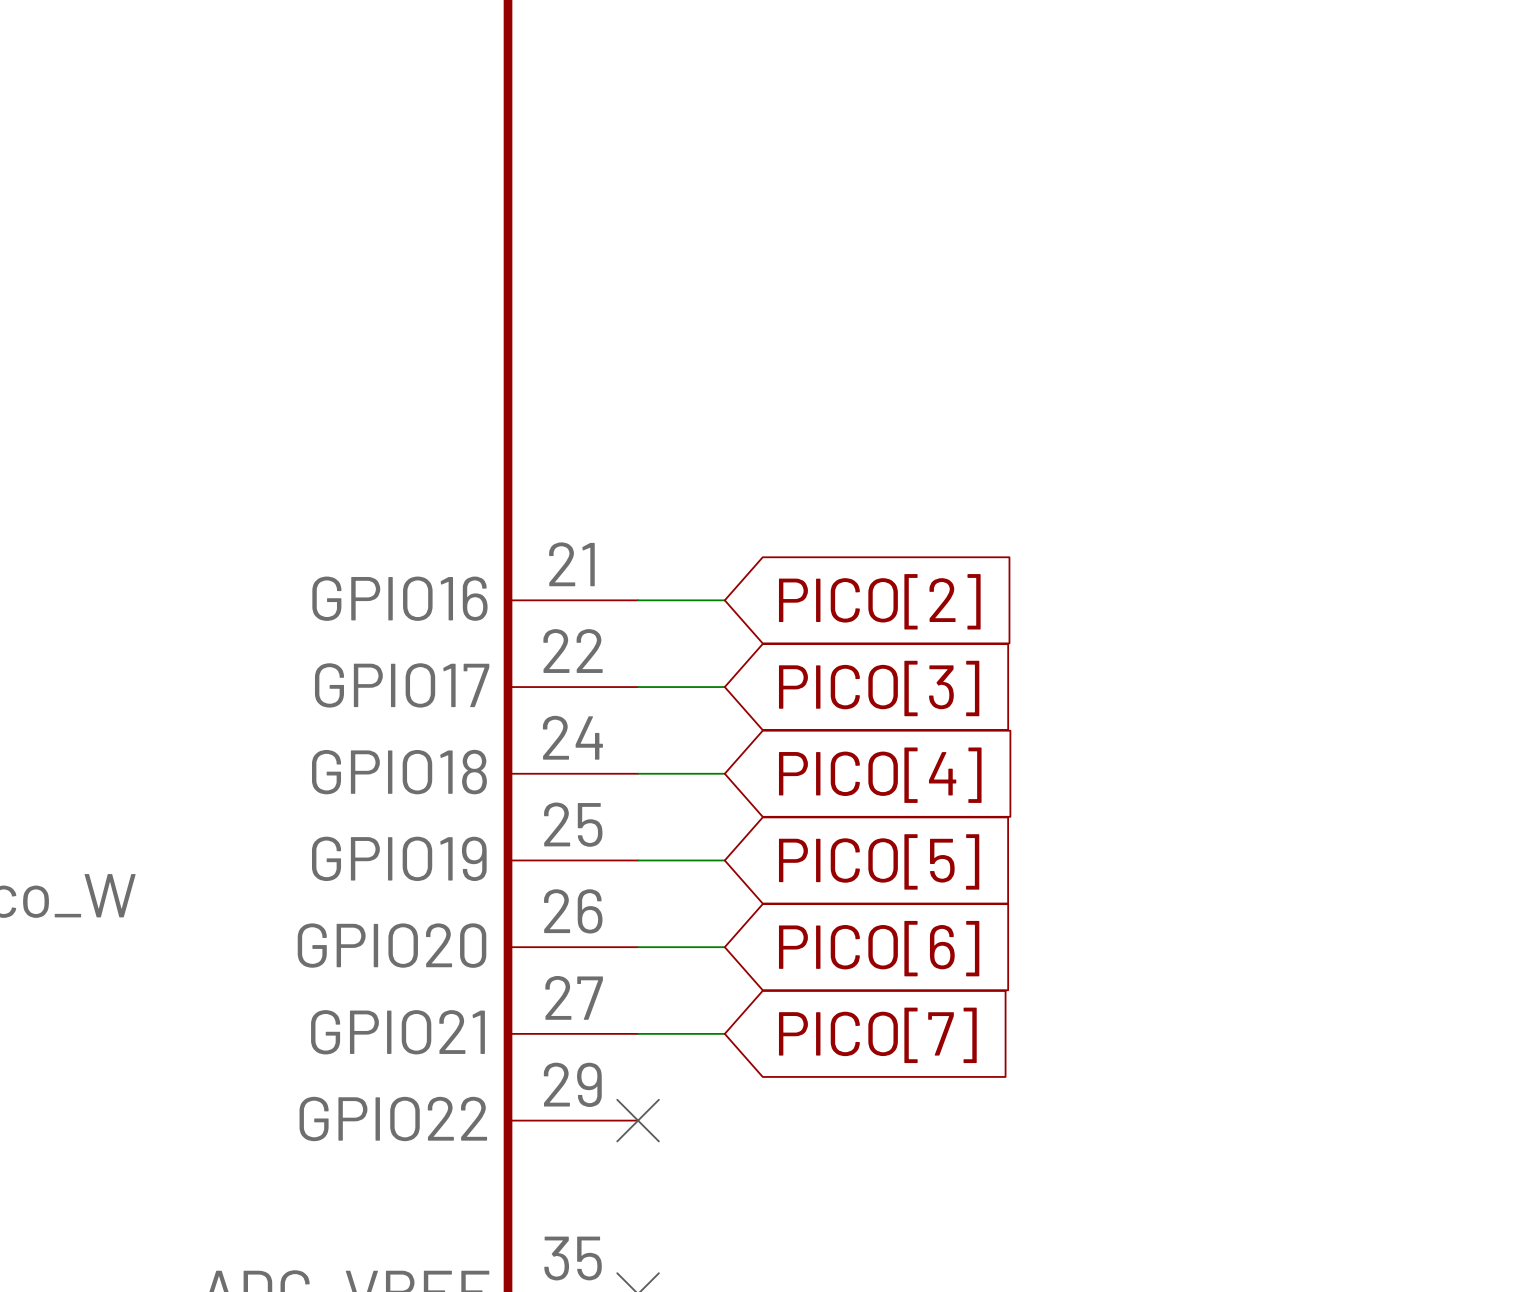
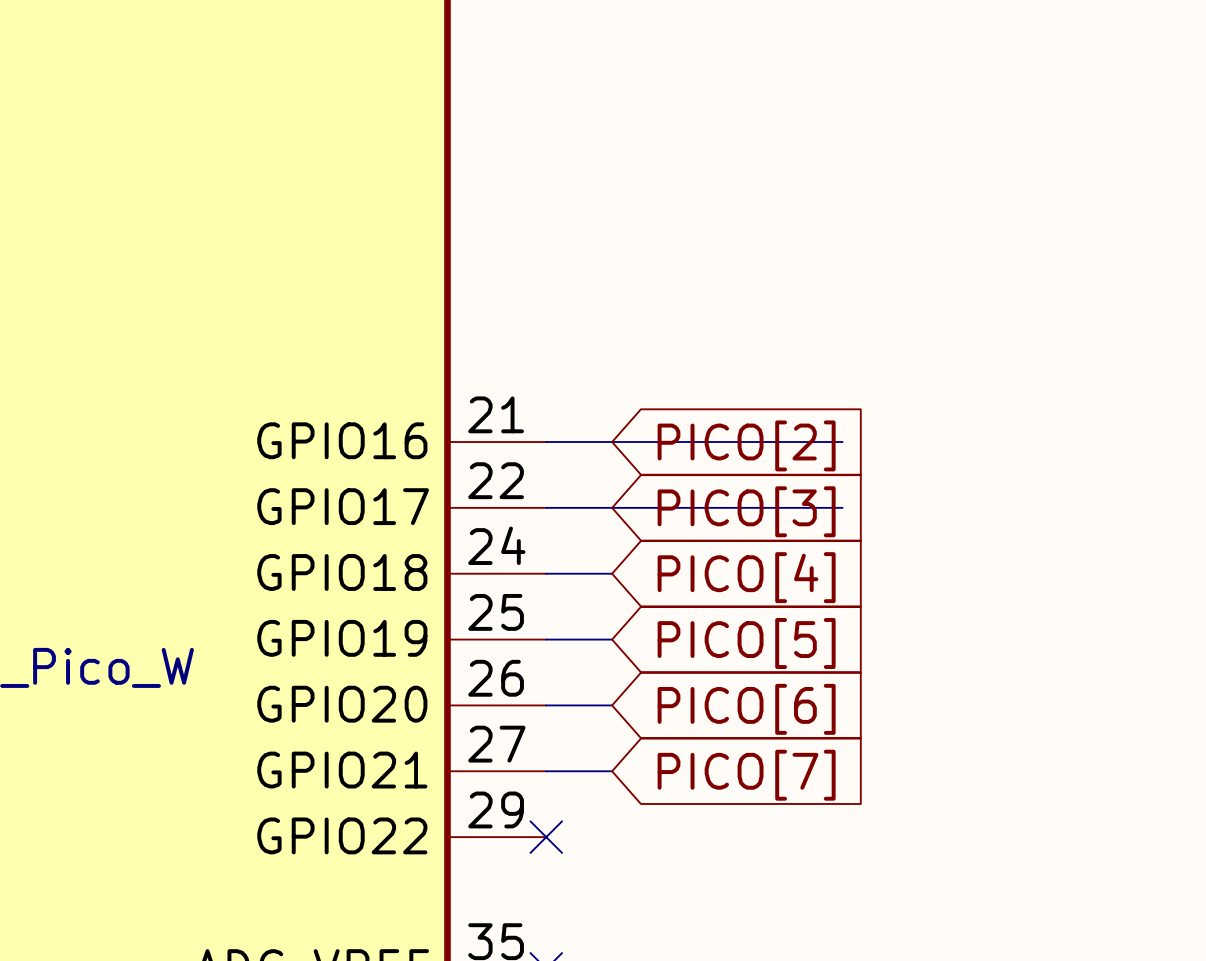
wire: none -> (612, 442) (842, 442)
wire: none -> (612, 507) (842, 507)

